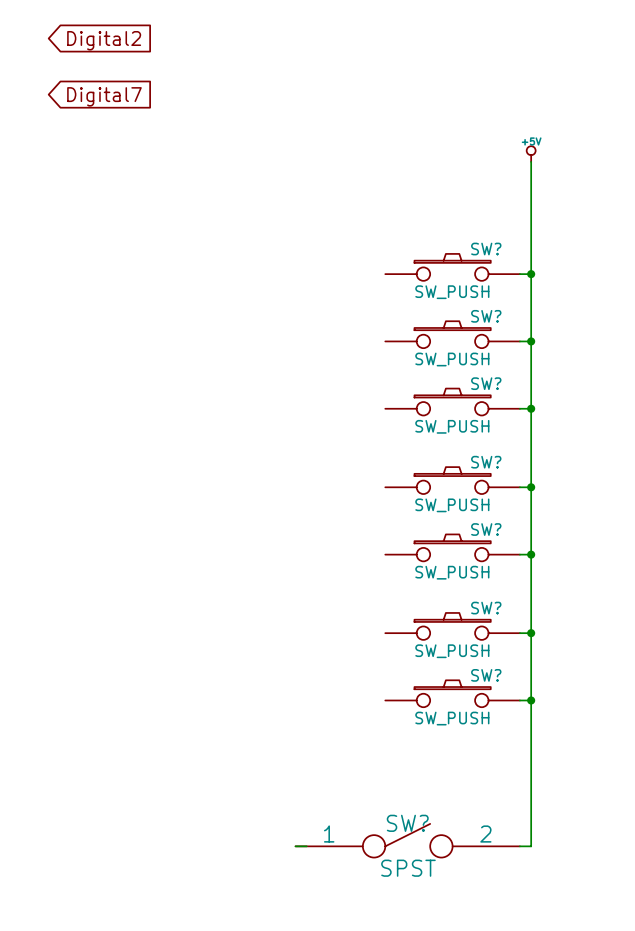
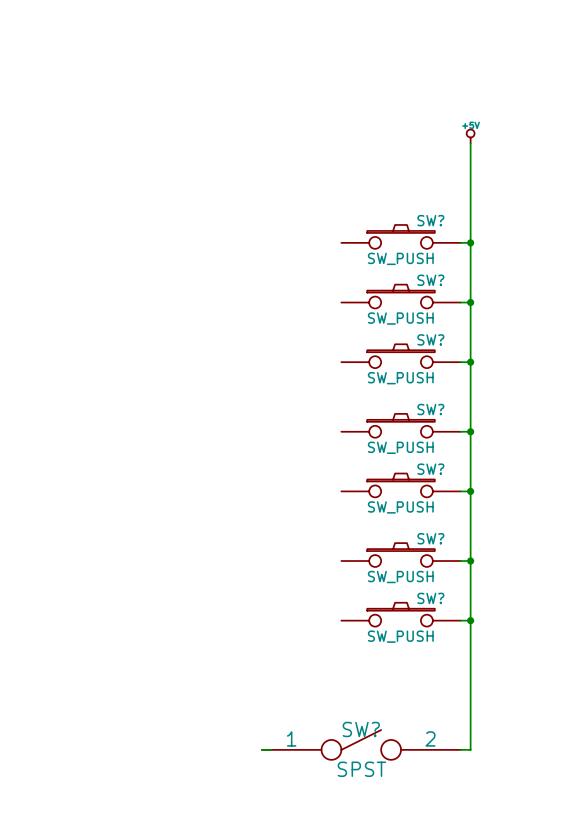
global label: Digital2 (104, 40) -> none
global label: Digital7 (104, 96) -> none

